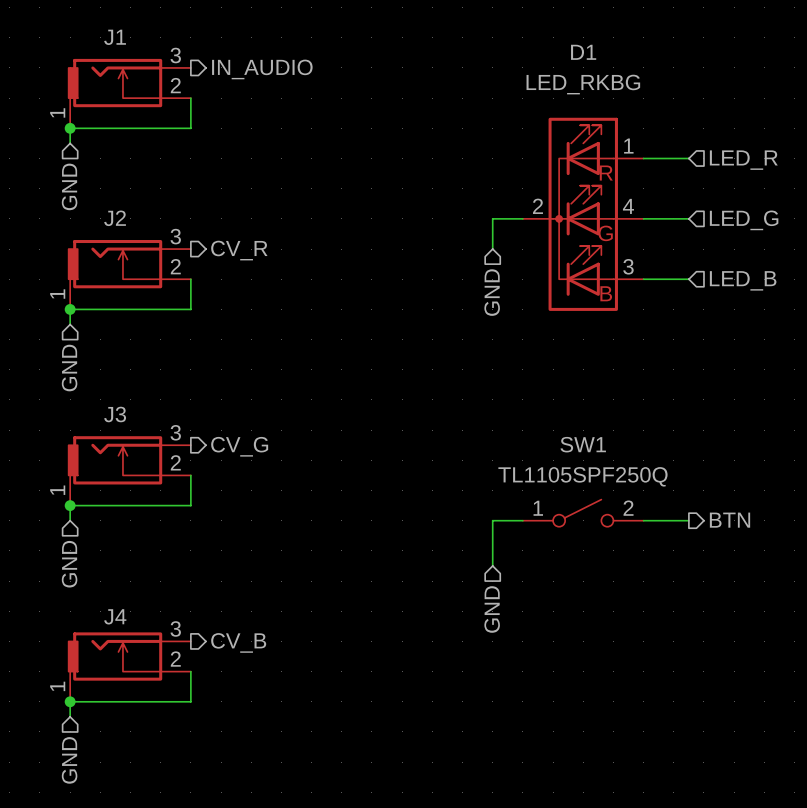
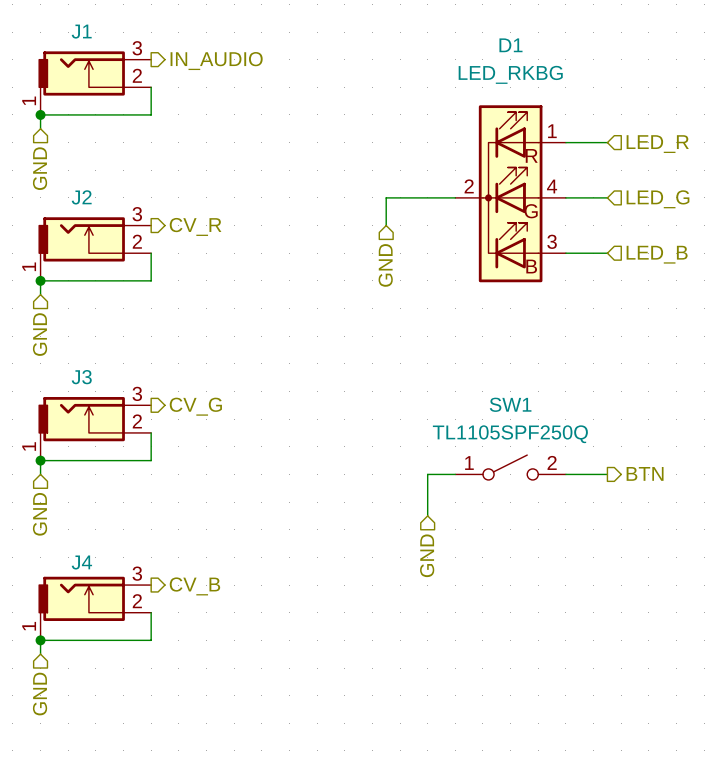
wire: (492, 218) (492, 249) -> (427, 197) (386, 197) (386, 225)
hierarchical label position: GND (492, 292) -> GND (385, 265)

